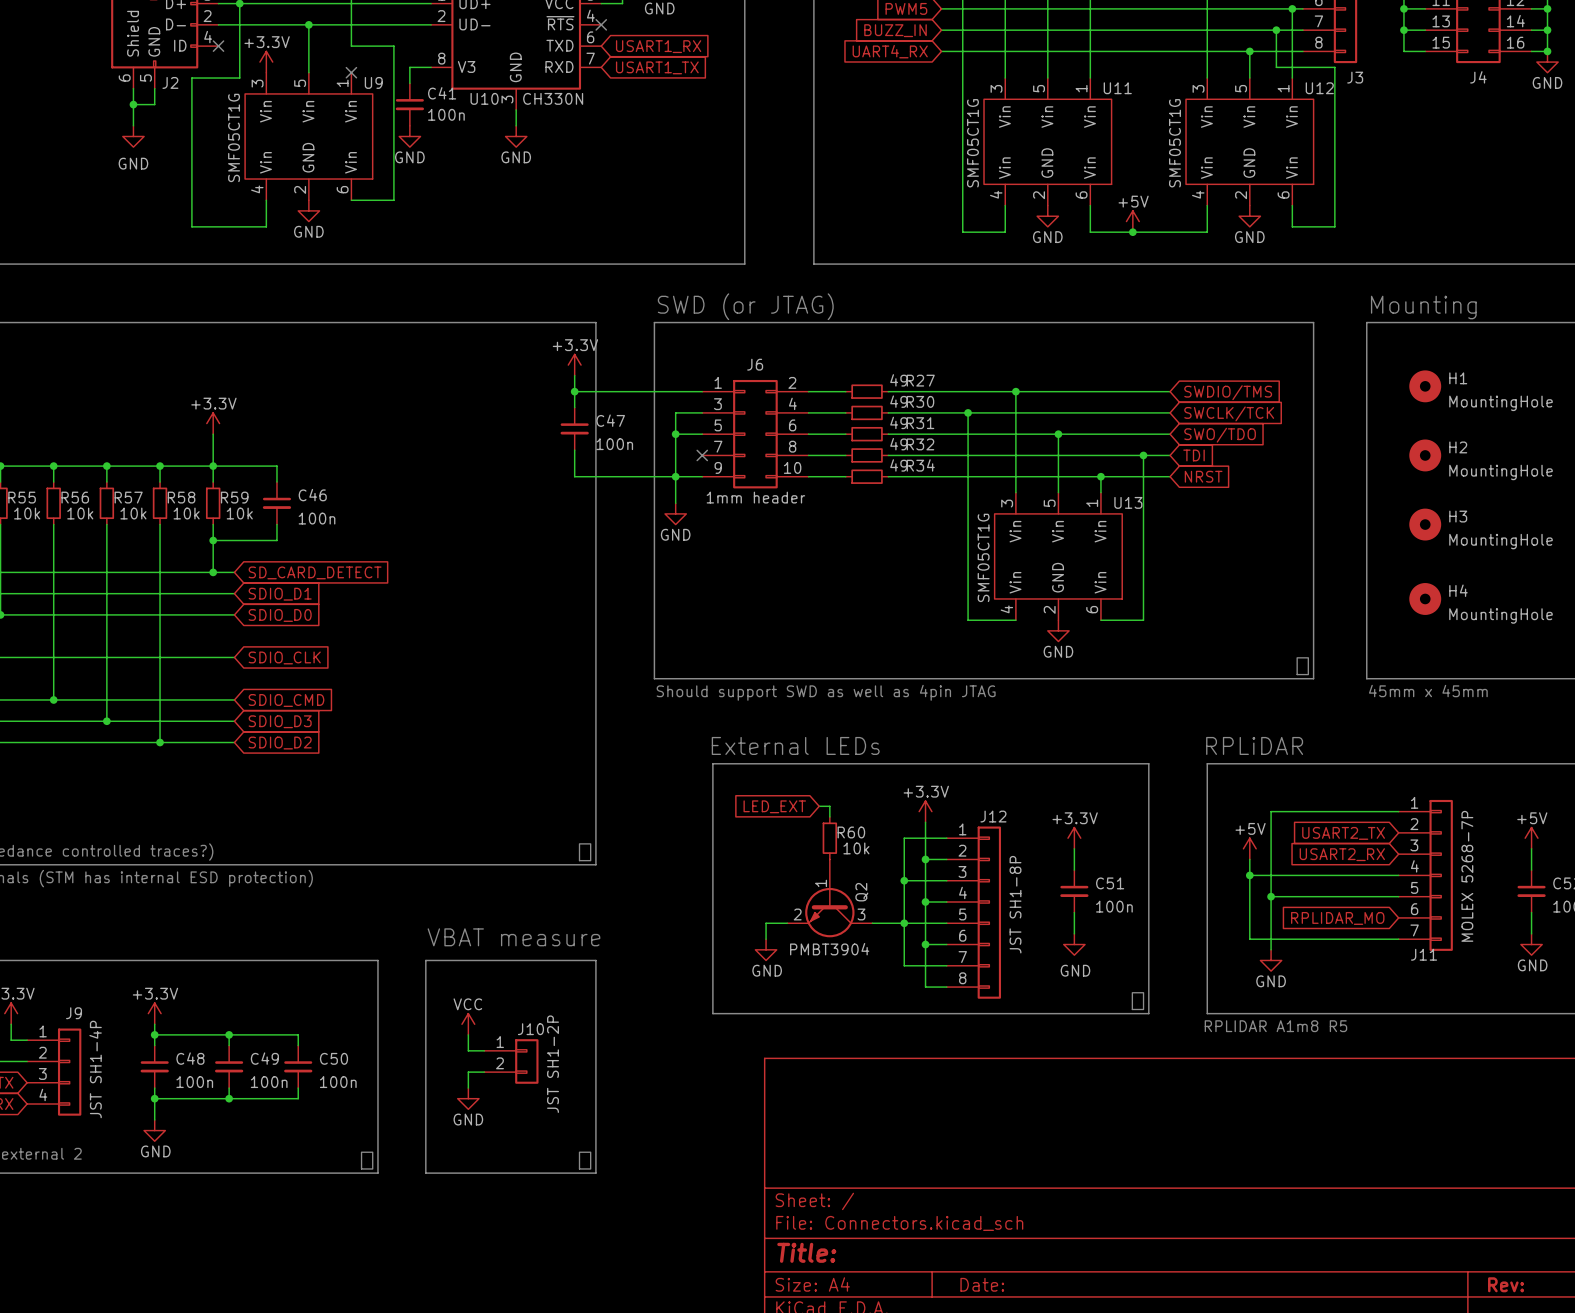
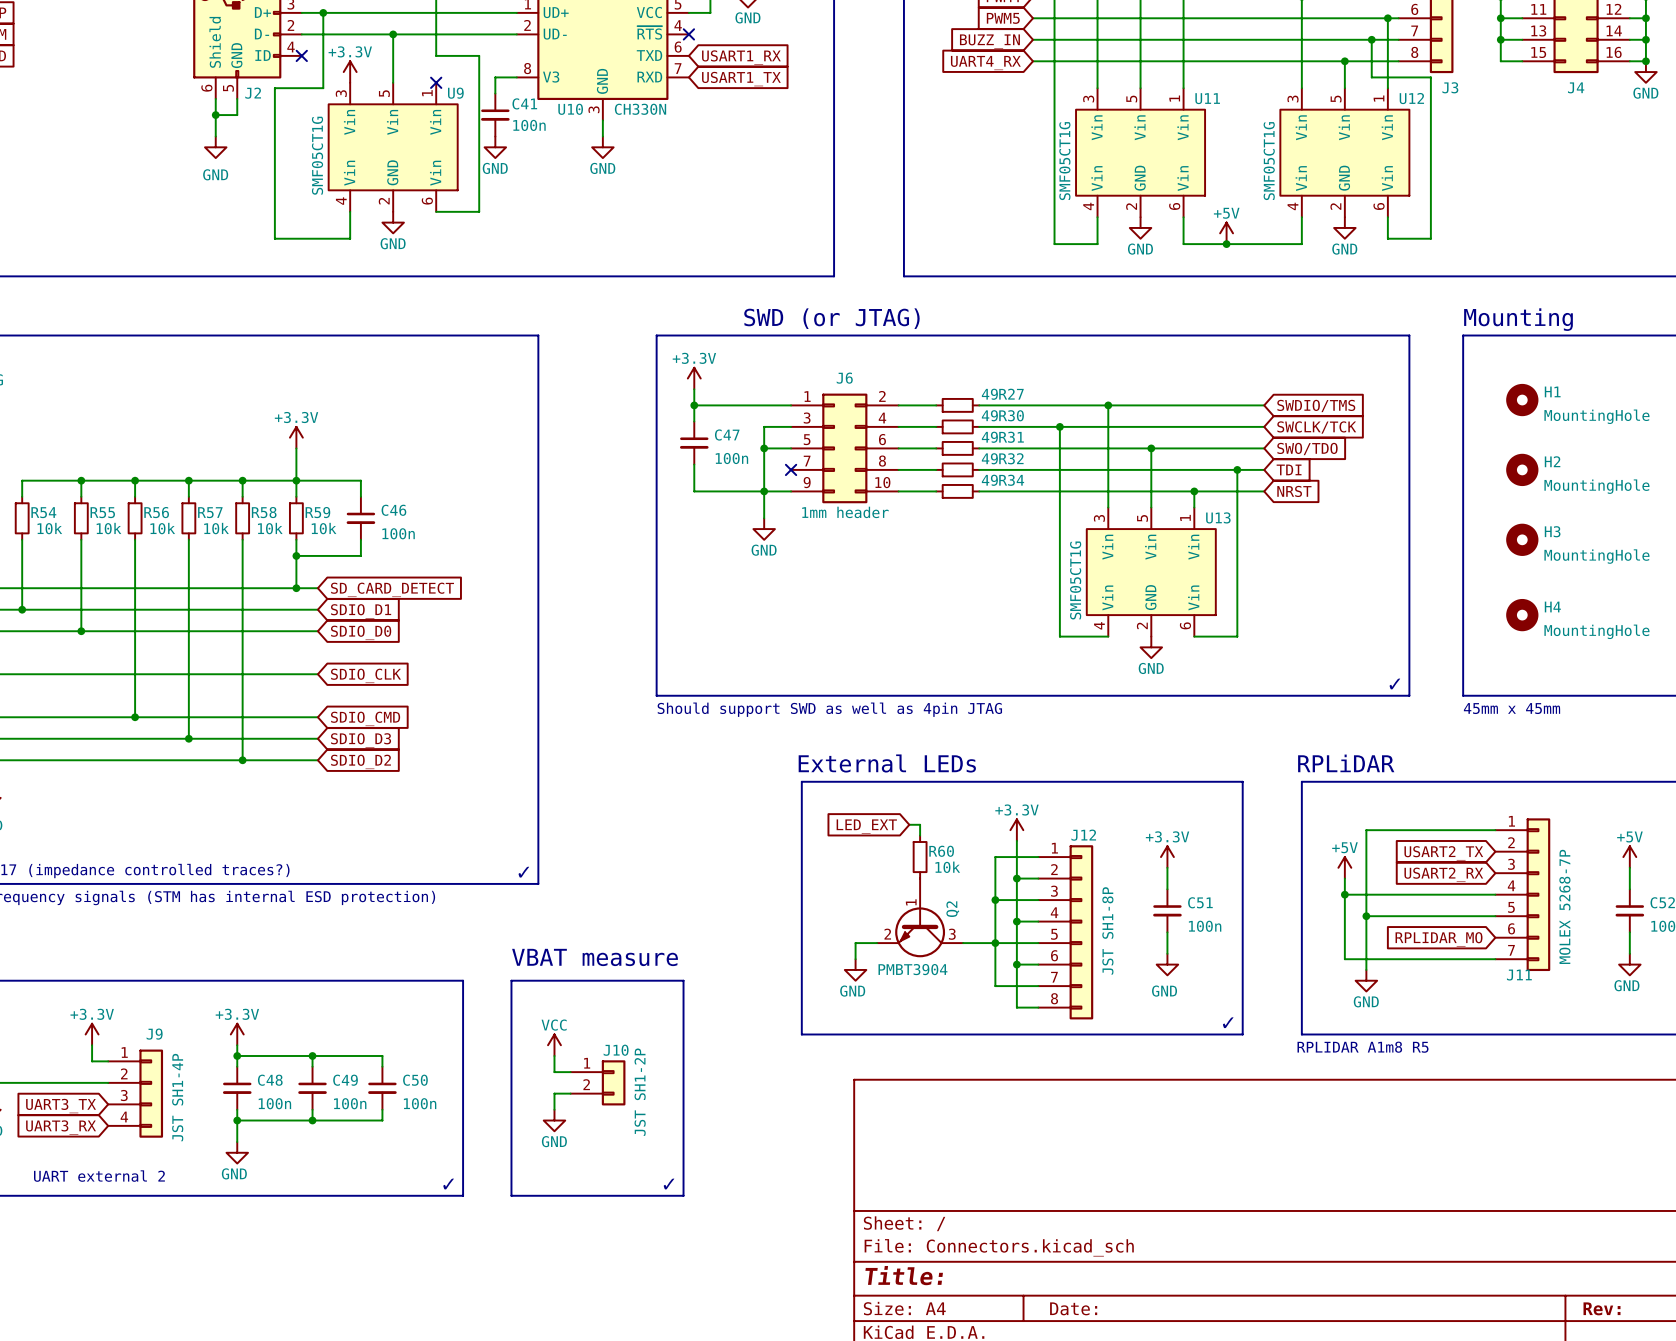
line: (452, 322) (569, 322) -> none
line: (595, 322) (595, 864) (452, 864) -> (538, 335) (538, 883)
line: none -> (683, 335) (742, 335)
line: (654, 322) (654, 678) -> (656, 335) (656, 695) (742, 695)
power symbol position: +3.3V (574, 365) -> +3.3V (694, 378)
wire: (574, 375) (574, 407) -> (694, 389) (694, 421)
wire: (574, 391) (606, 391) -> none
junction position: (574, 391) -> (694, 405)
C47 position: (574, 428) -> (694, 443)
wire: (574, 450) (574, 476) (606, 476) -> (694, 464) (694, 491)
text position: Should support SWD as well as 4pin JTAG (826, 692) -> Should support SWD as well as 4pin JTAG (829, 709)
text position: ✓ (585, 852) -> ✓ (523, 872)

